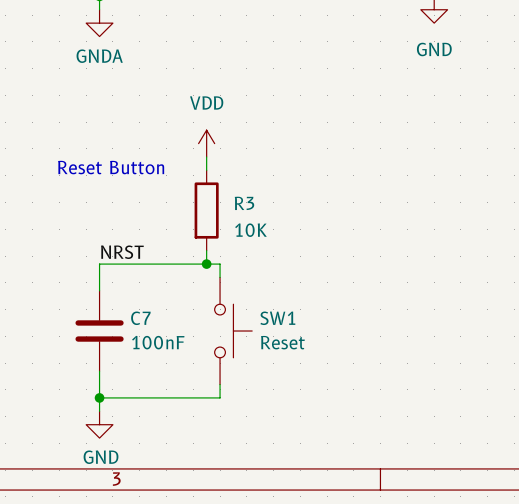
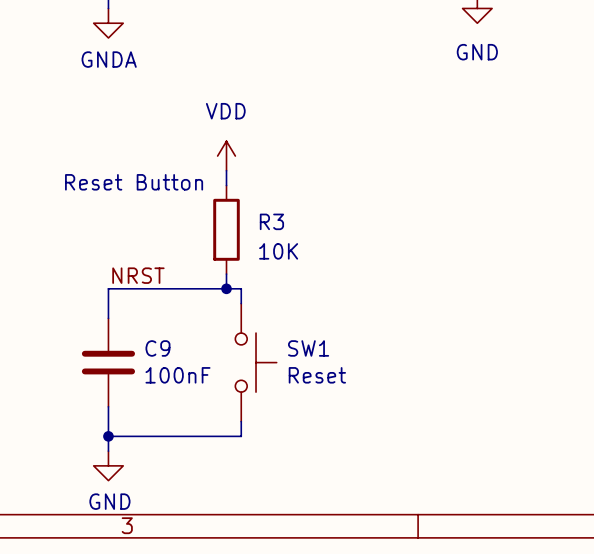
C7 name: C7 (140, 318) -> C9 (157, 348)

